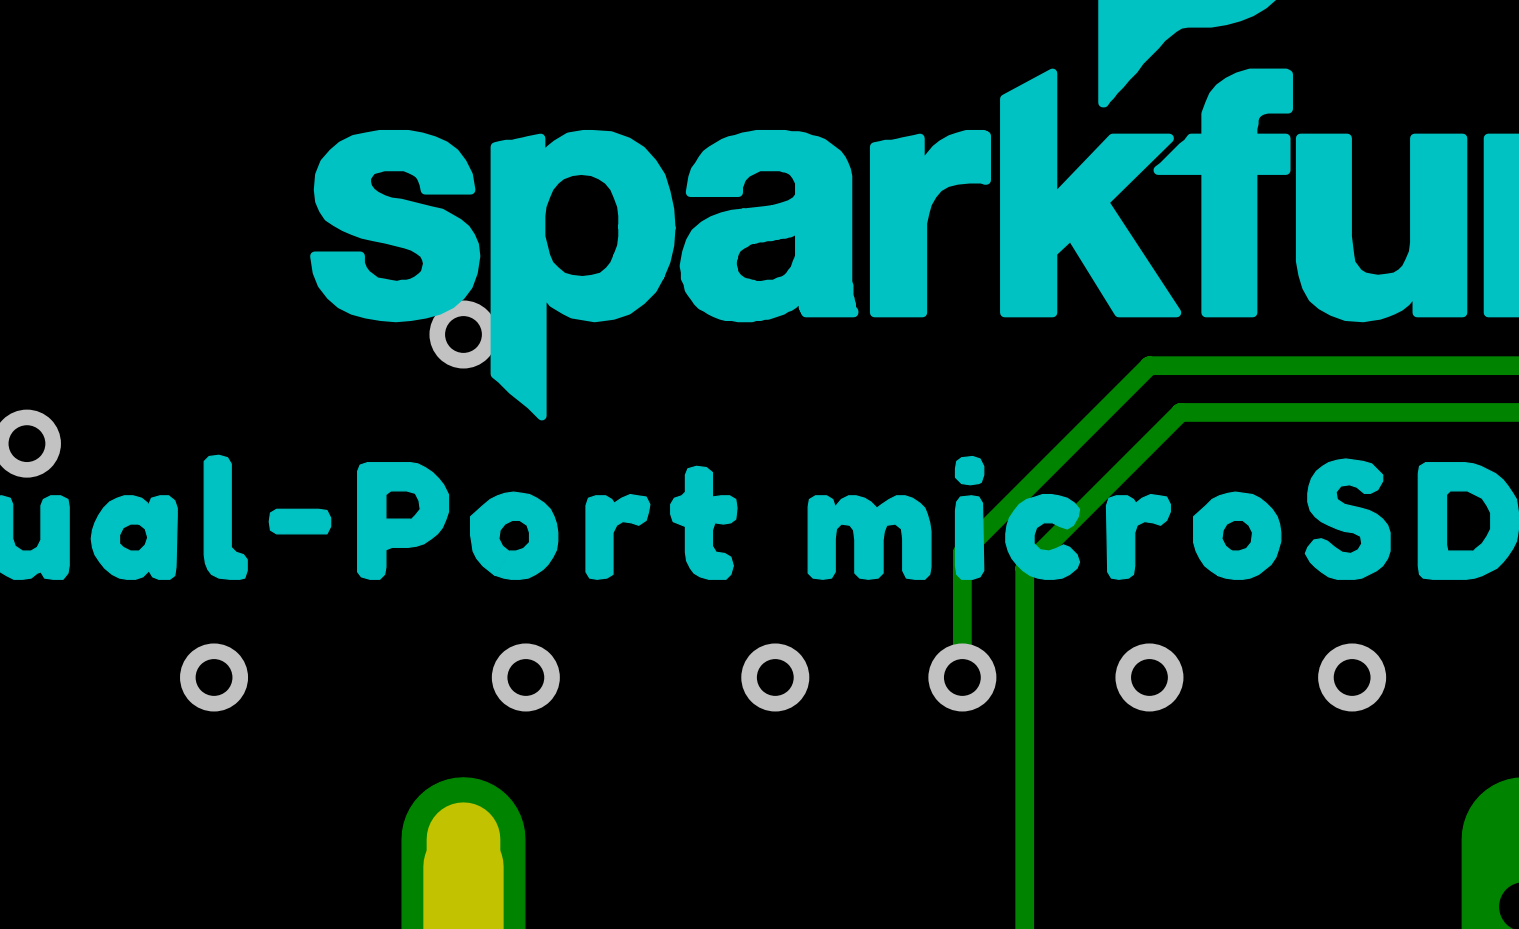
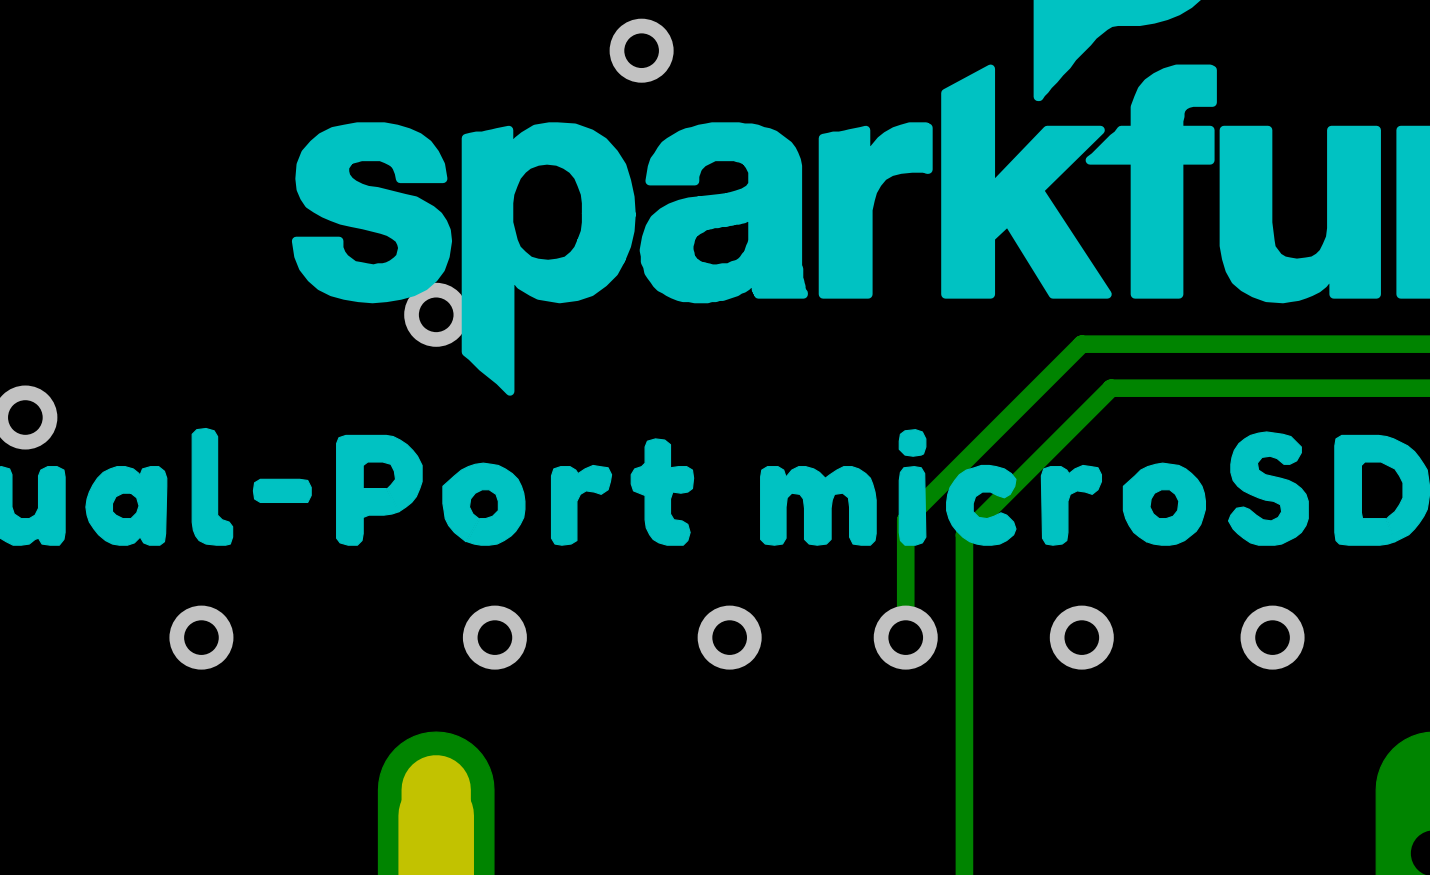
via: none -> (641, 50)

